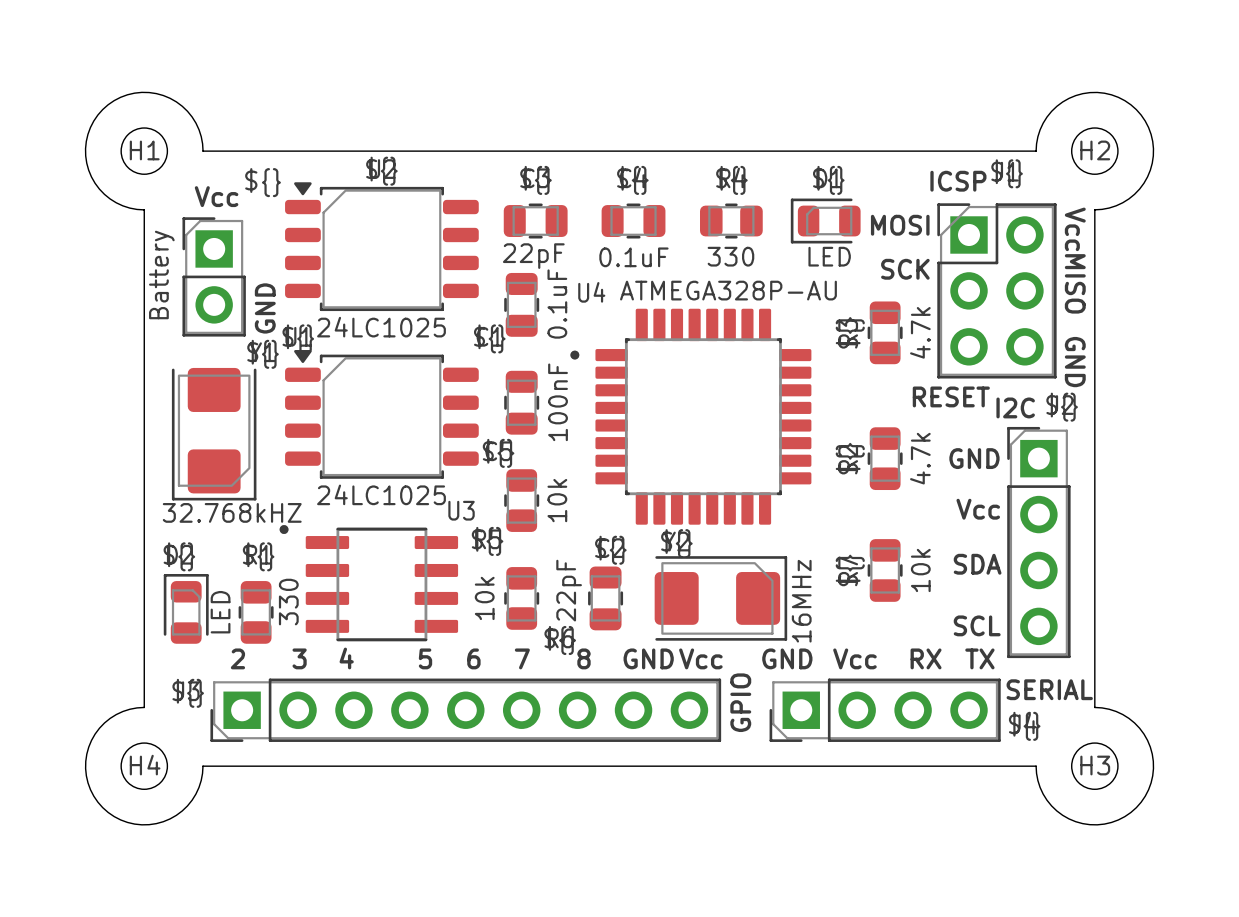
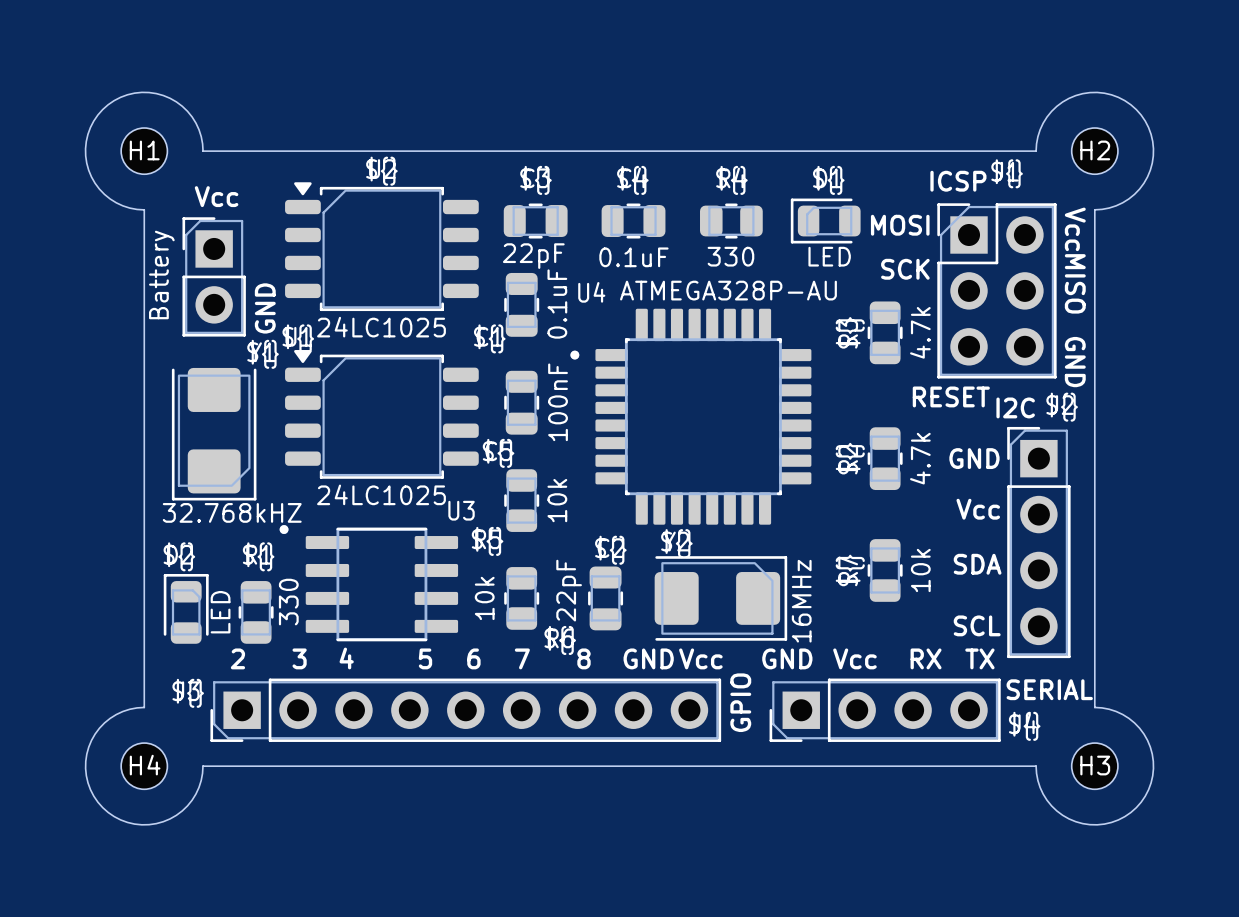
part text: ${} (263, 182) -> none

